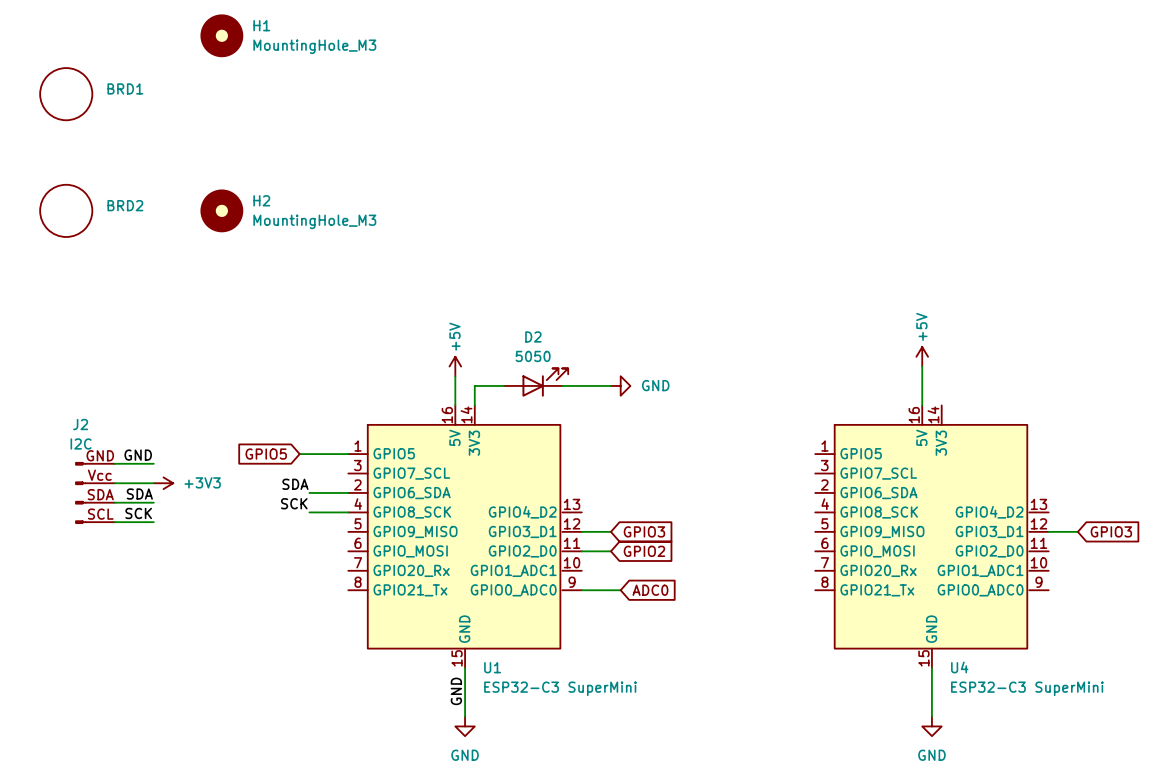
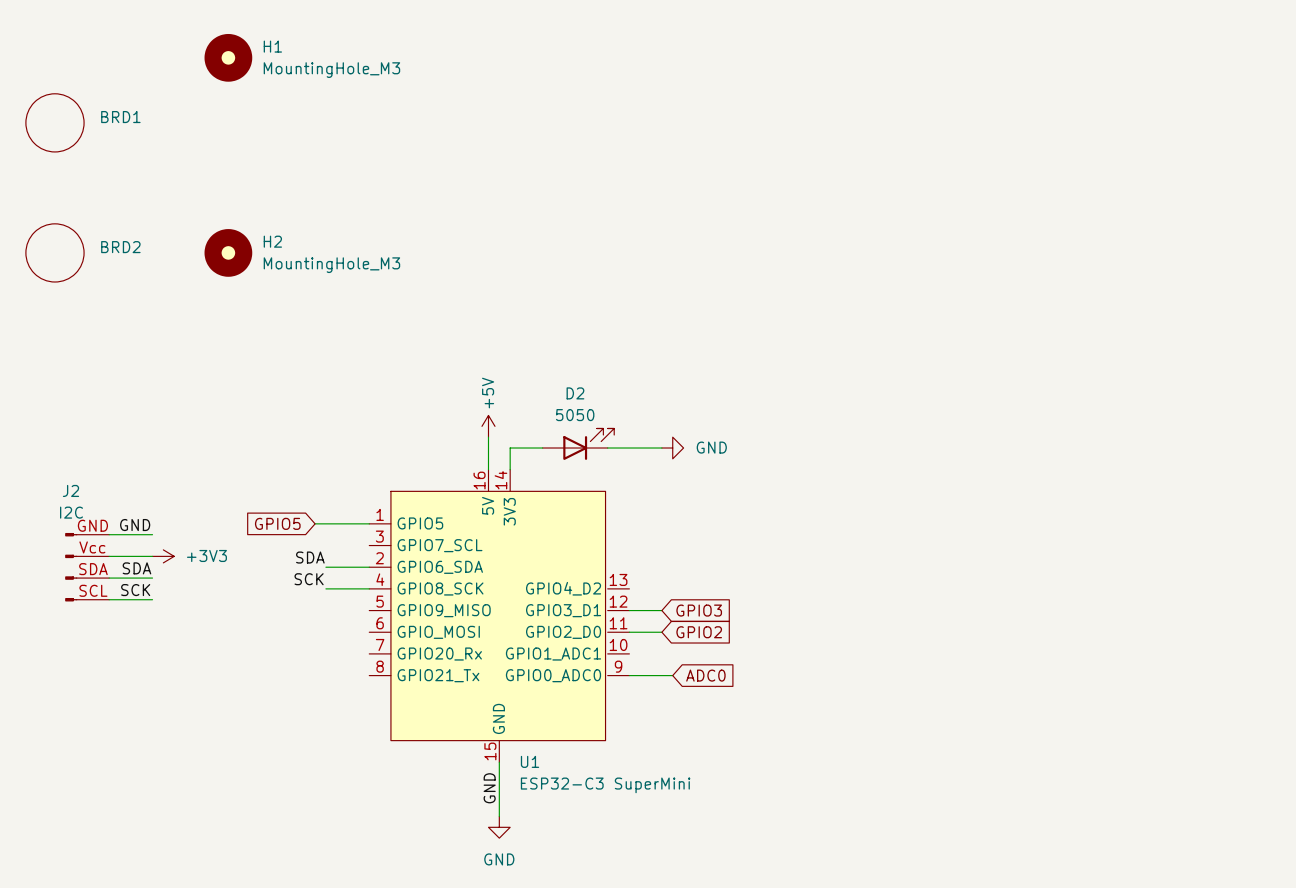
power symbol: +5V (922, 356) -> none
wire: (922, 366) (922, 405) -> none
wire: (1048, 531) (1077, 531) -> none
global label: GPIO3 (1111, 531) -> none
U4: ESP32-C3 SuperMini (931, 536) -> none
wire: (931, 668) (931, 716) -> none
power symbol: GND (931, 726) -> none

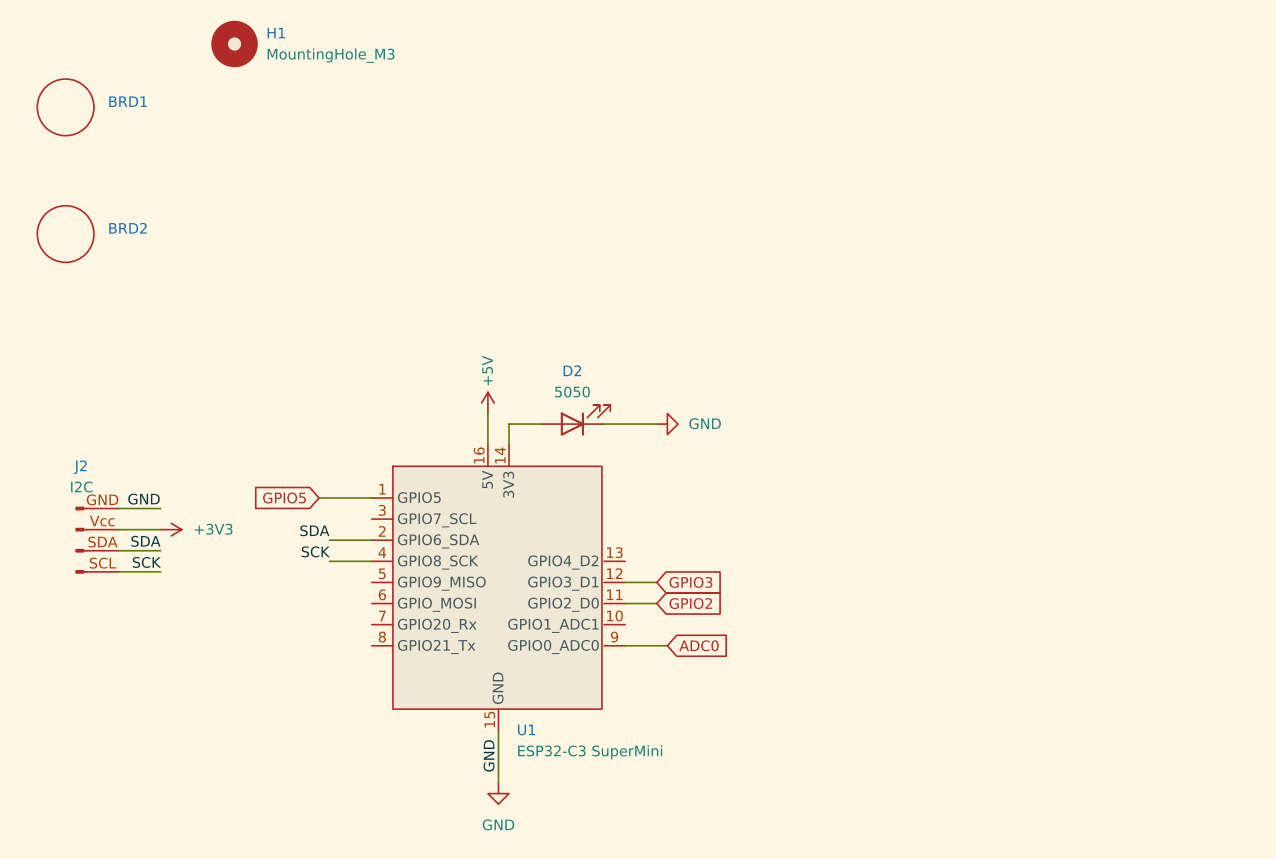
H2: MountingHole_M3 (228, 252) -> none

